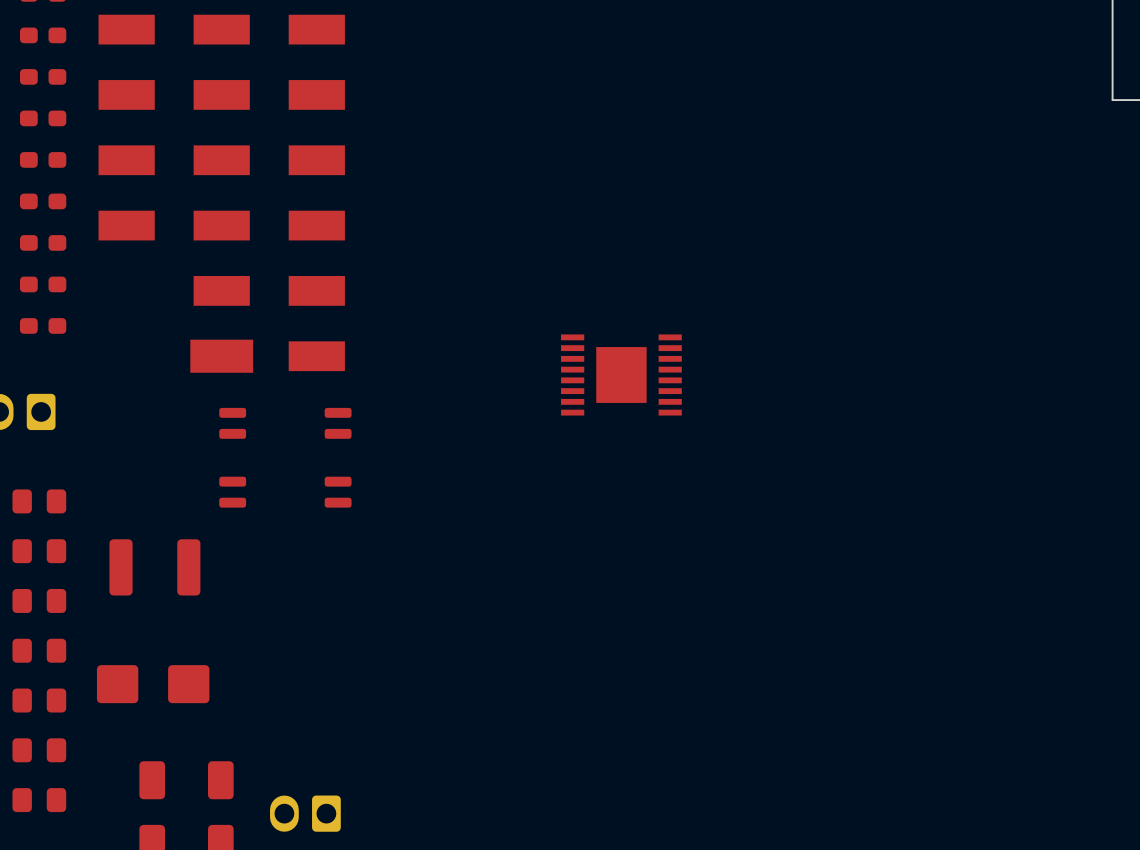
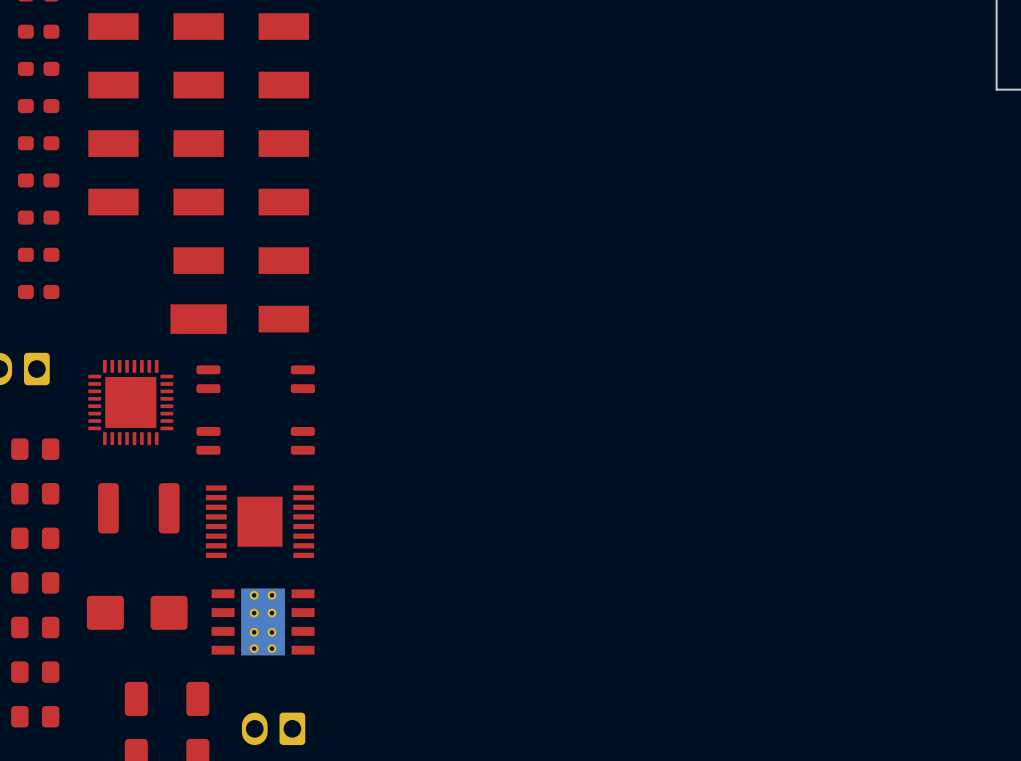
part position: (621, 374) -> (259, 521)
part: none -> (130, 402)
part: none -> (263, 621)

